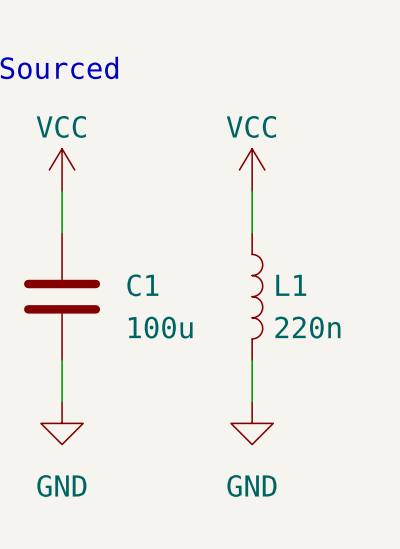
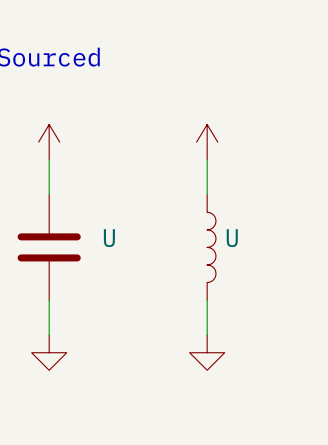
power symbol text: VCC (61, 126) -> none
power symbol text: VCC (251, 126) -> none
C1 name: C1 (142, 285) -> U (109, 238)
L1 name: L1 (291, 285) -> U (232, 238)
C1 value: 100u (160, 327) -> none
L1 value: 220n (307, 327) -> none
power symbol text: GND (61, 485) -> none
power symbol text: GND (251, 485) -> none

